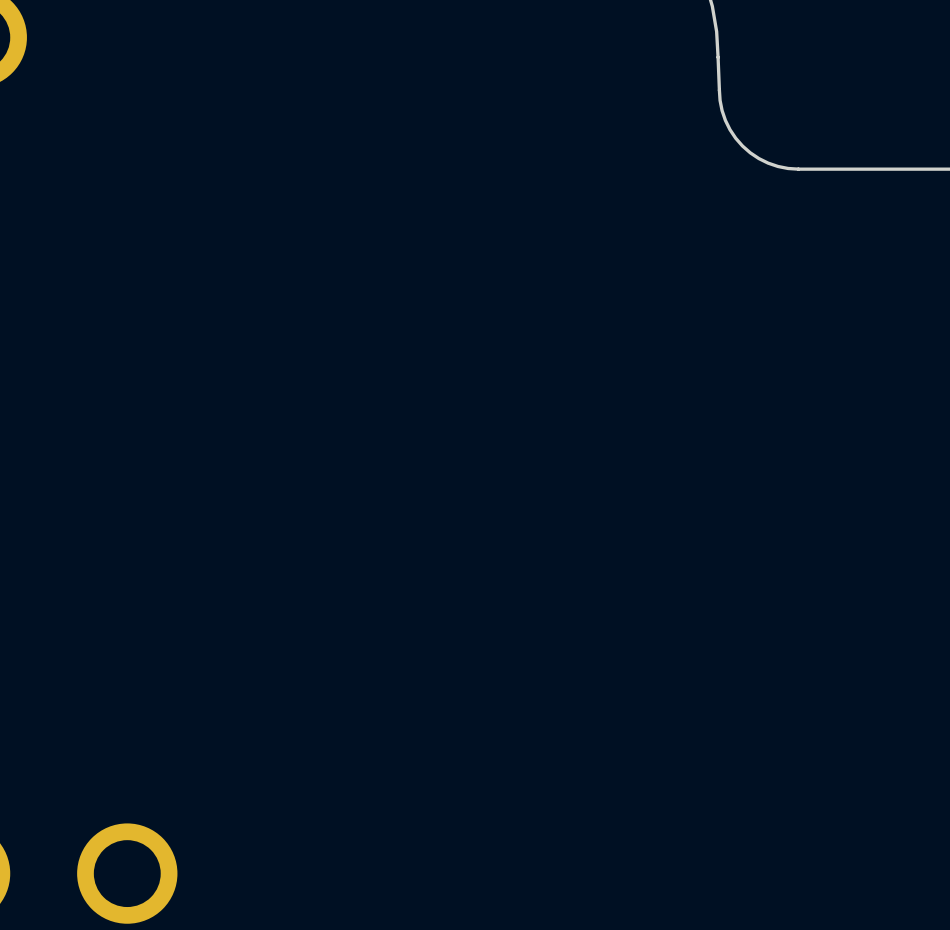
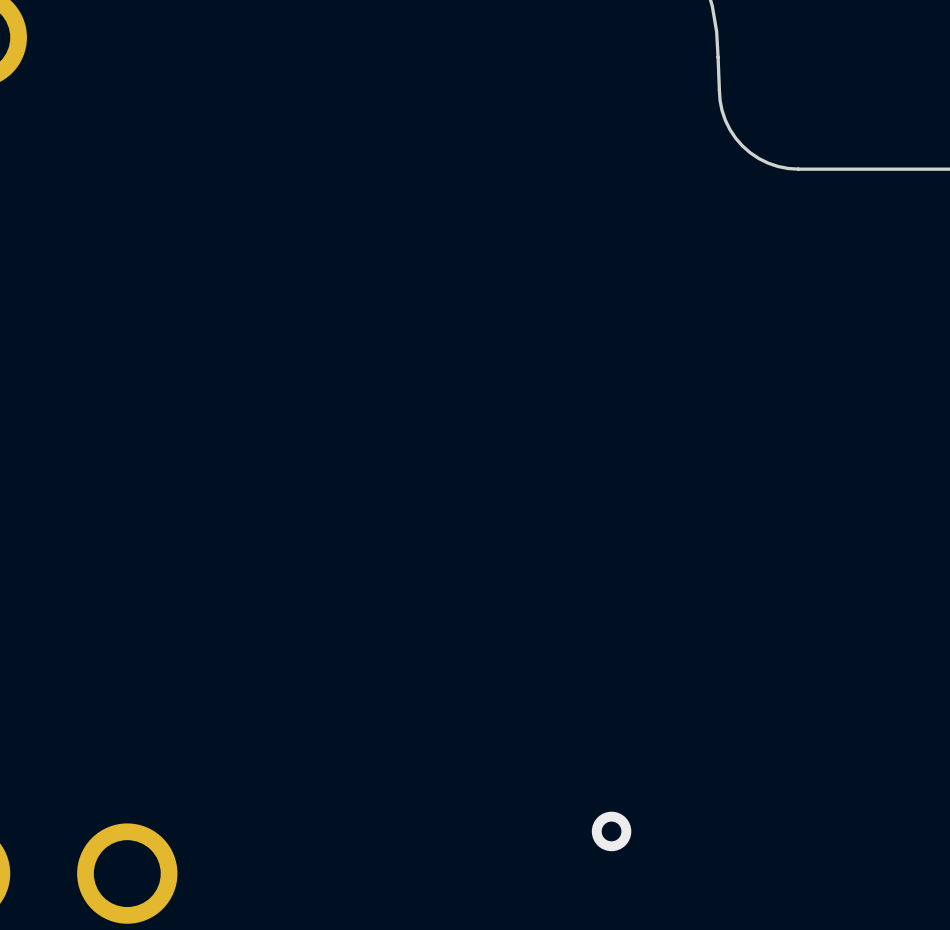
via: none -> (611, 831)

